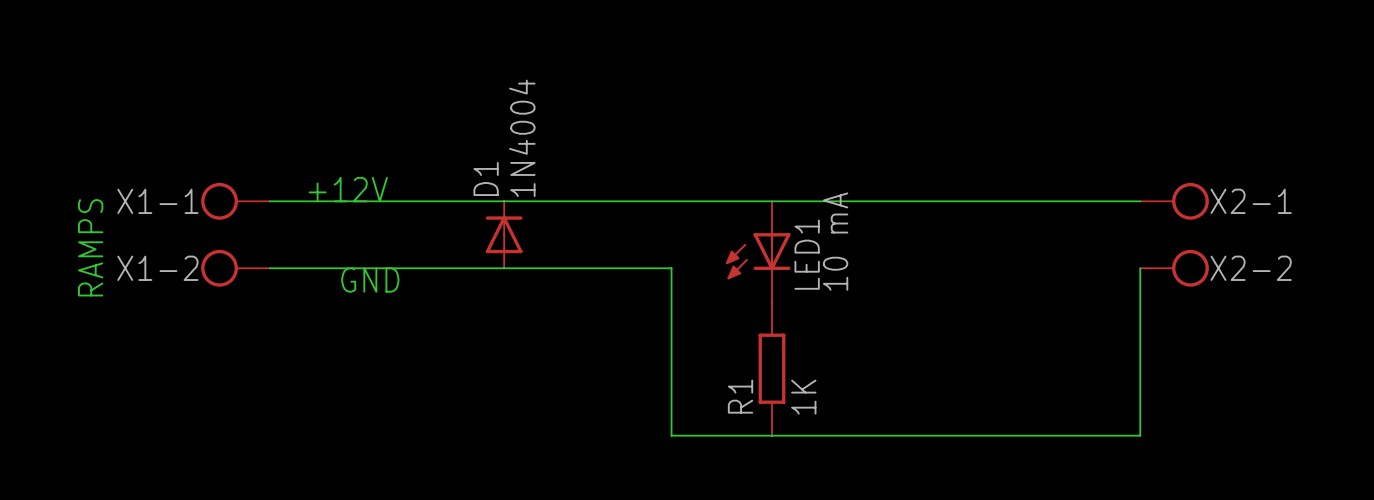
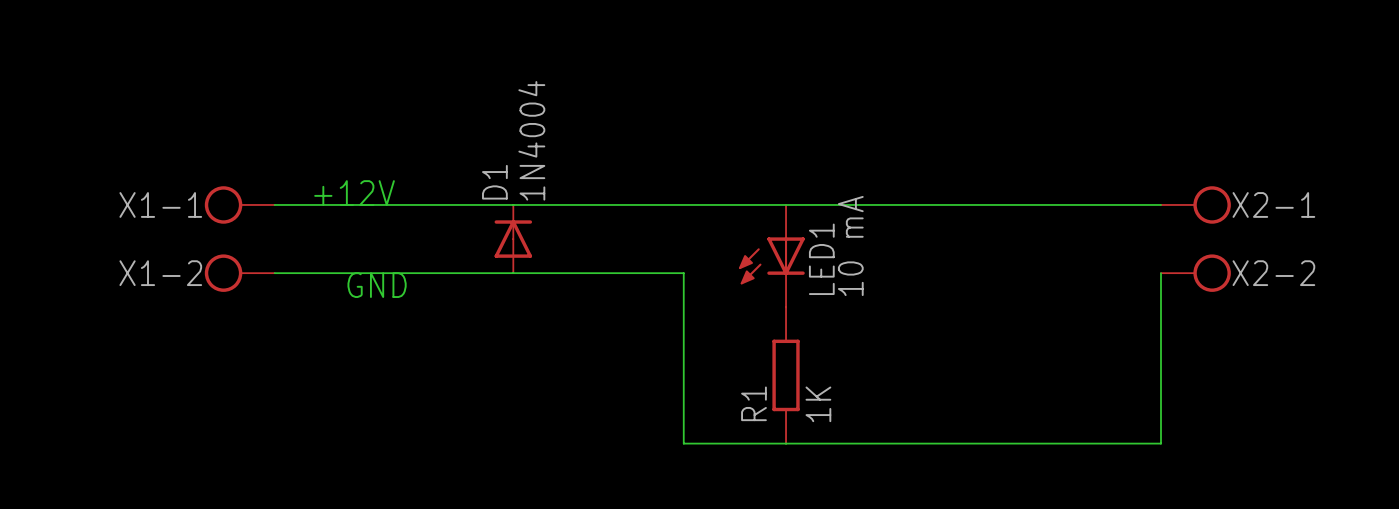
text: RAMPS (90, 247) -> none

